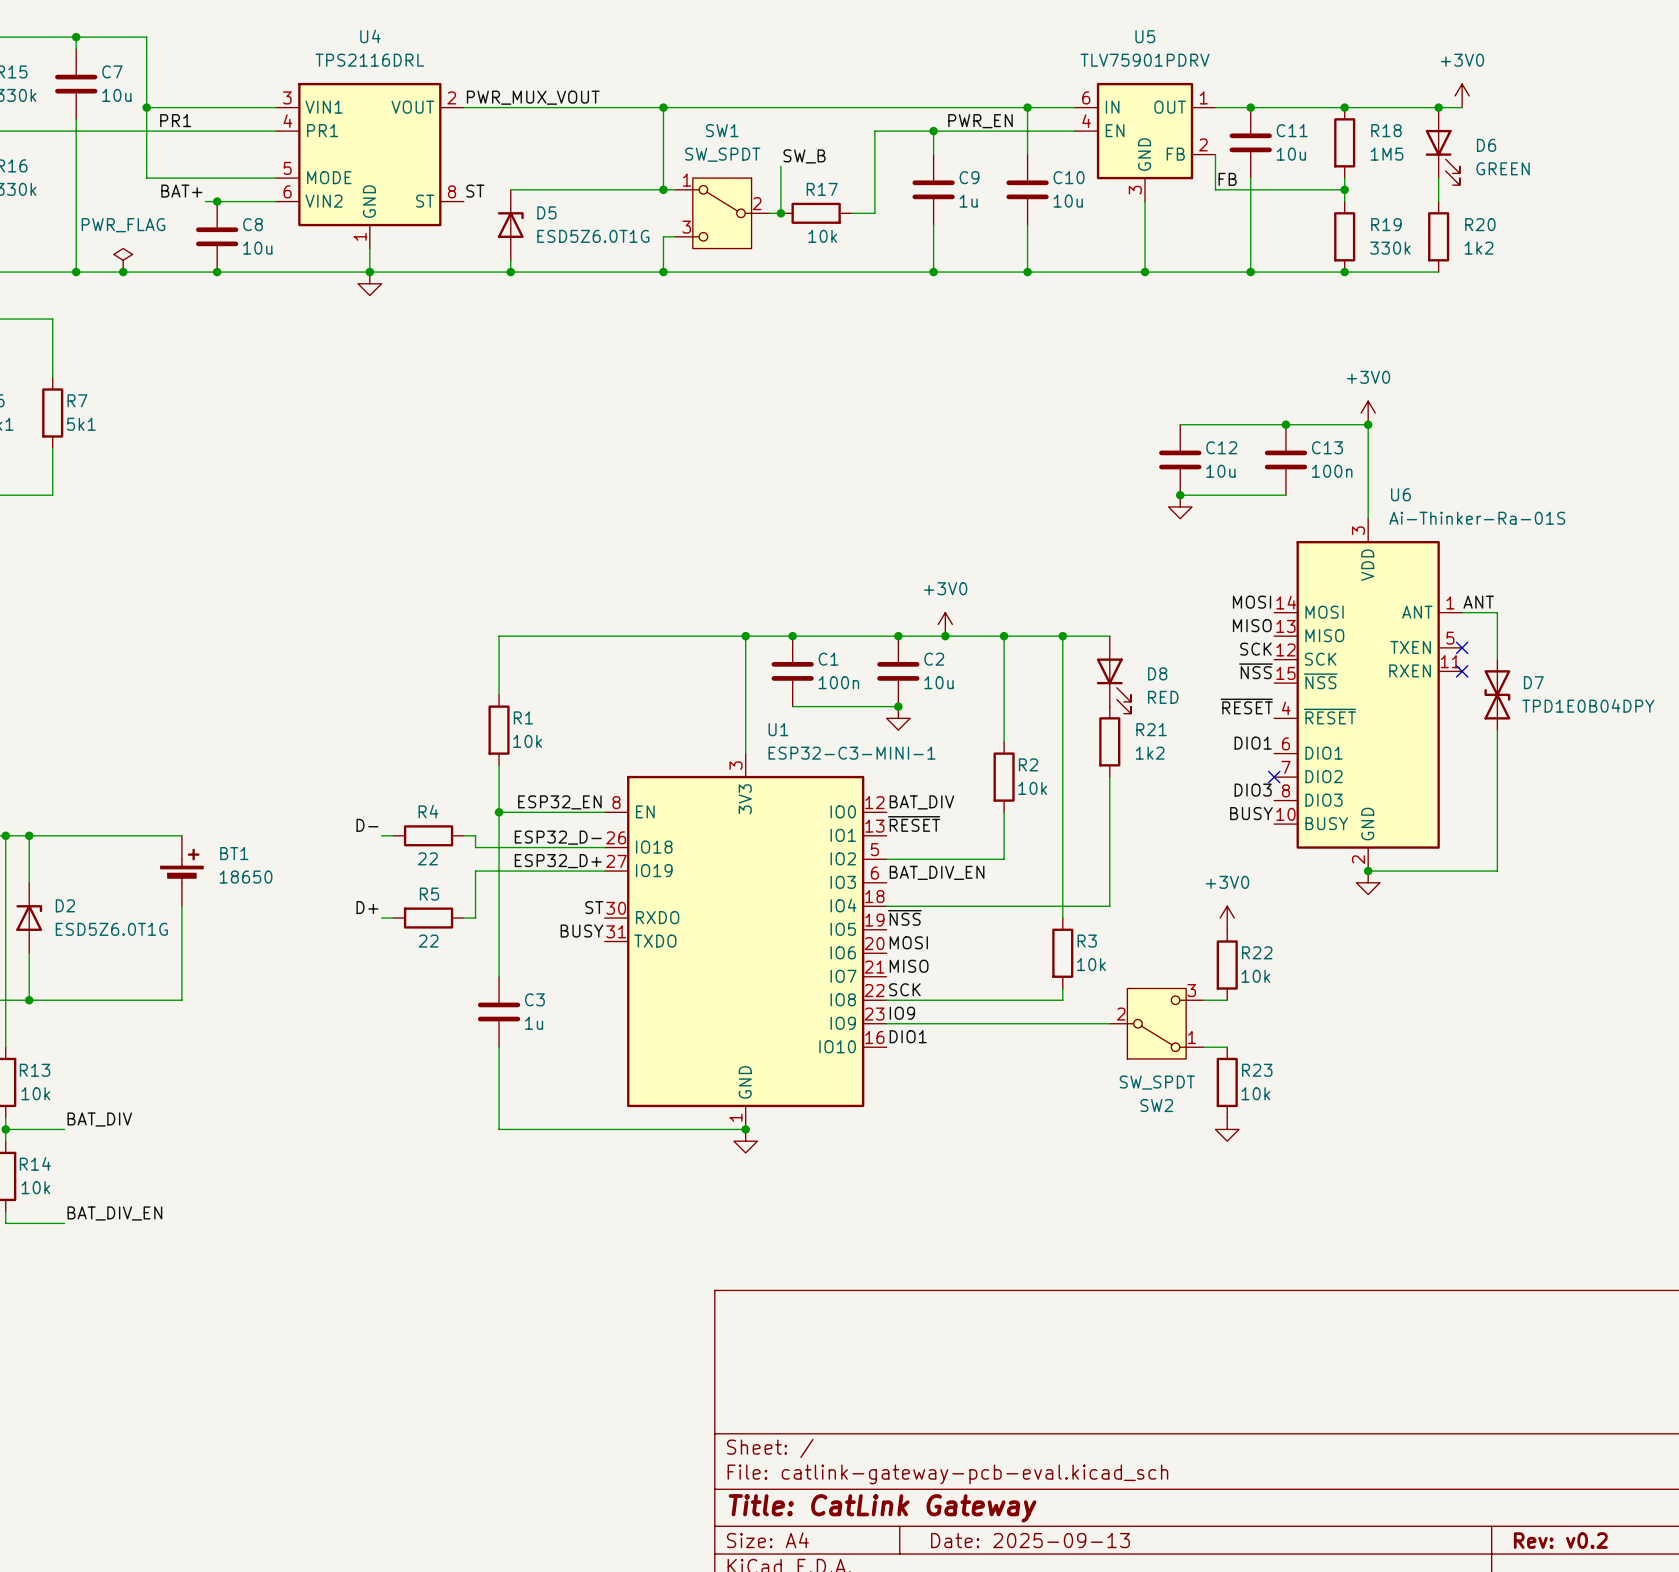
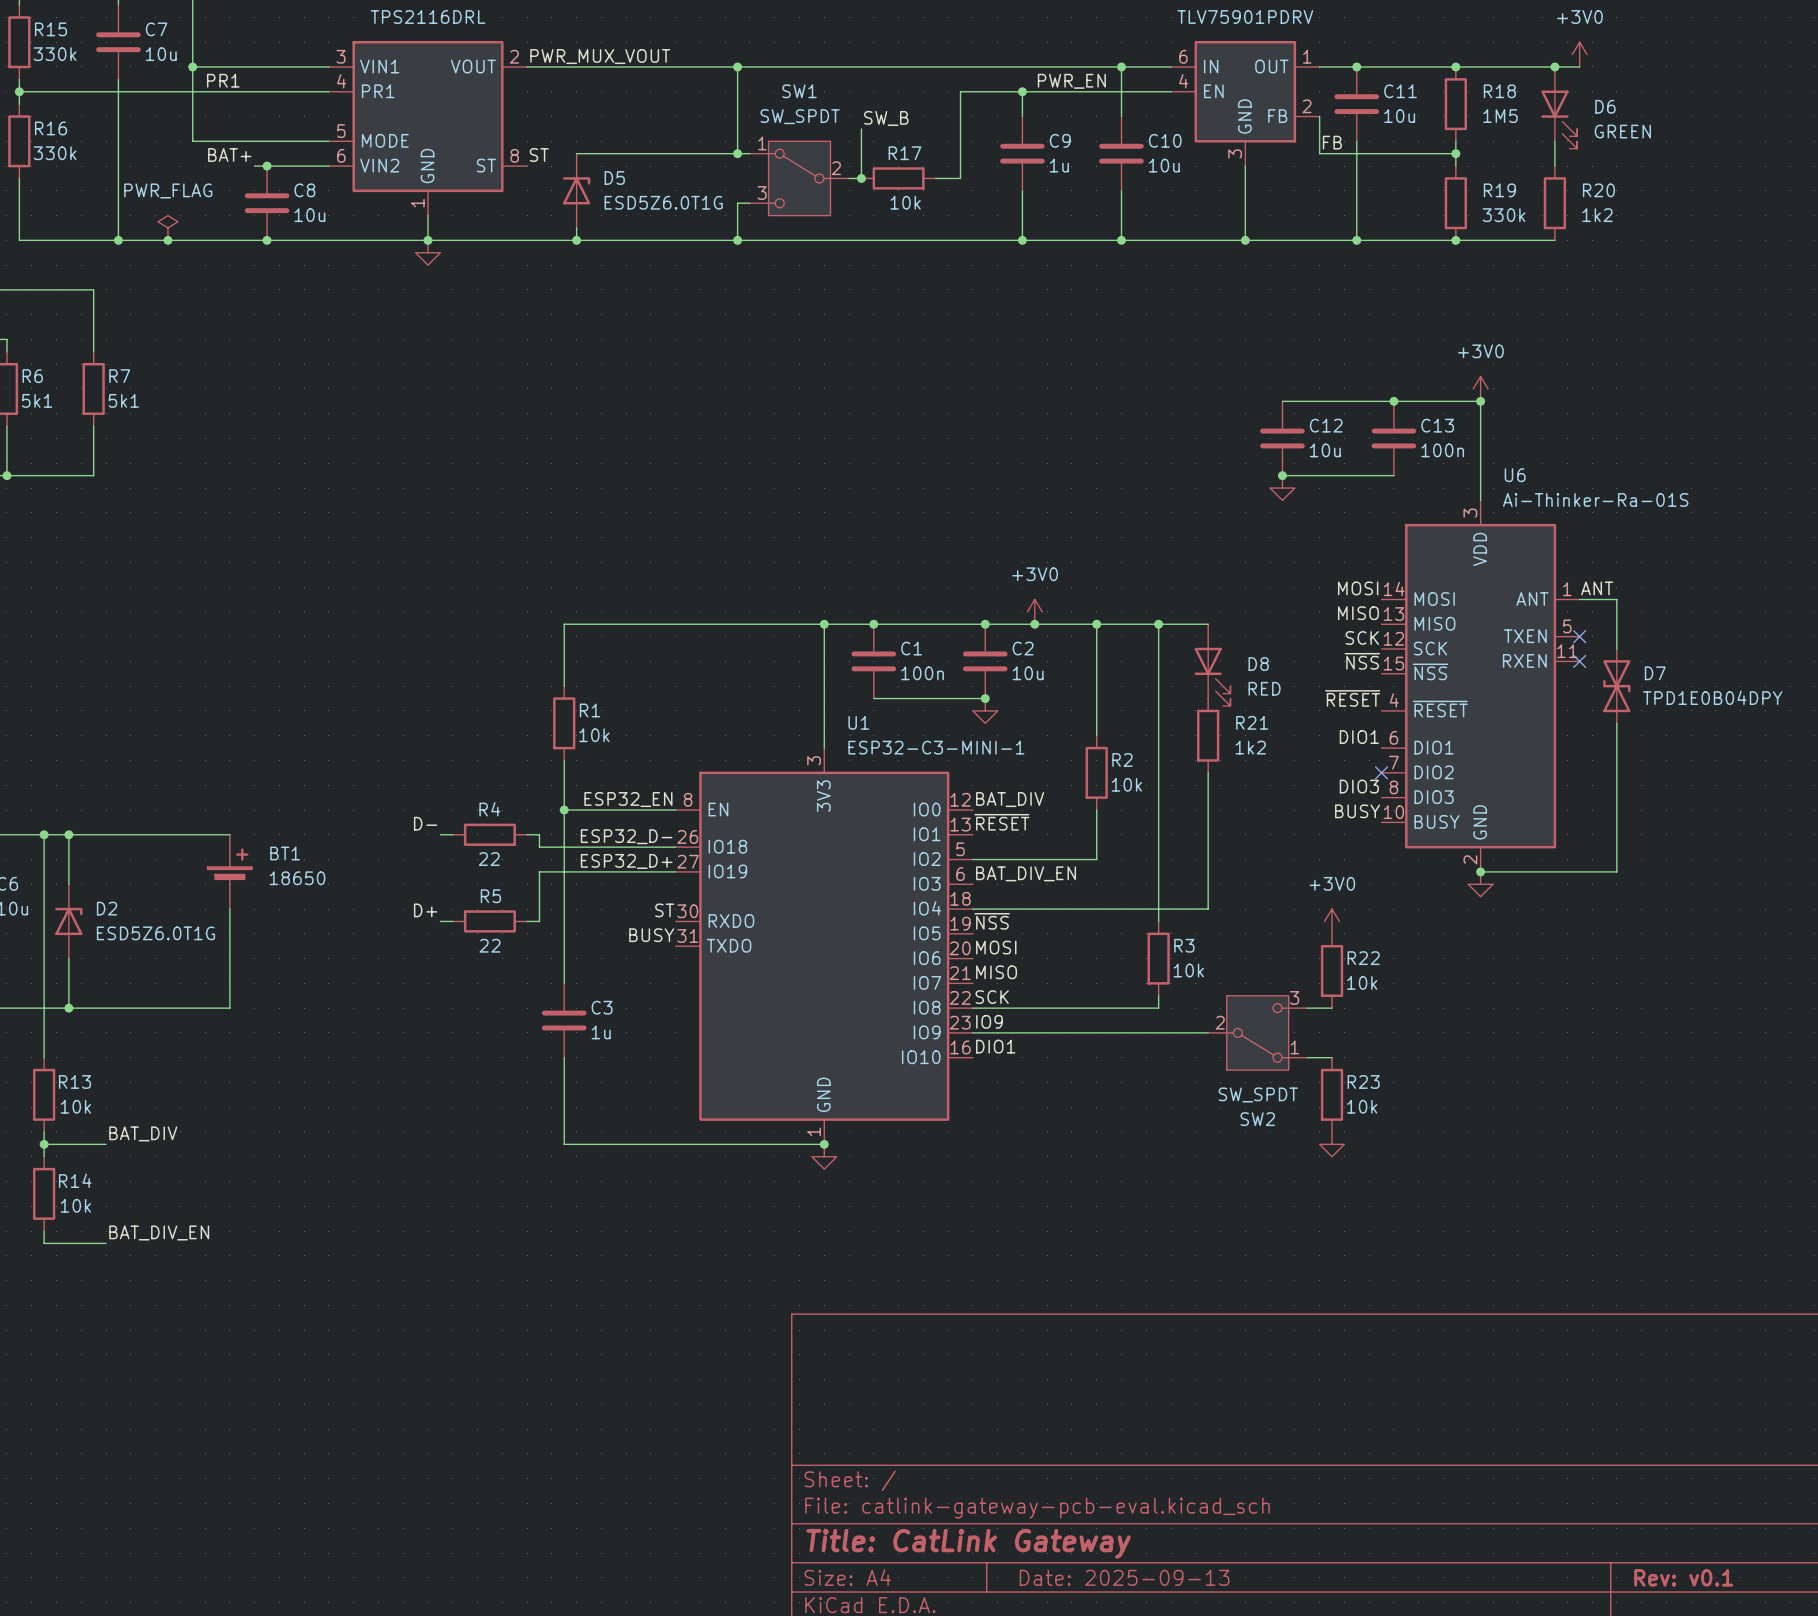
title block: Rev: v0.2 (1560, 1540) -> Rev: v0.1 (1683, 1577)

